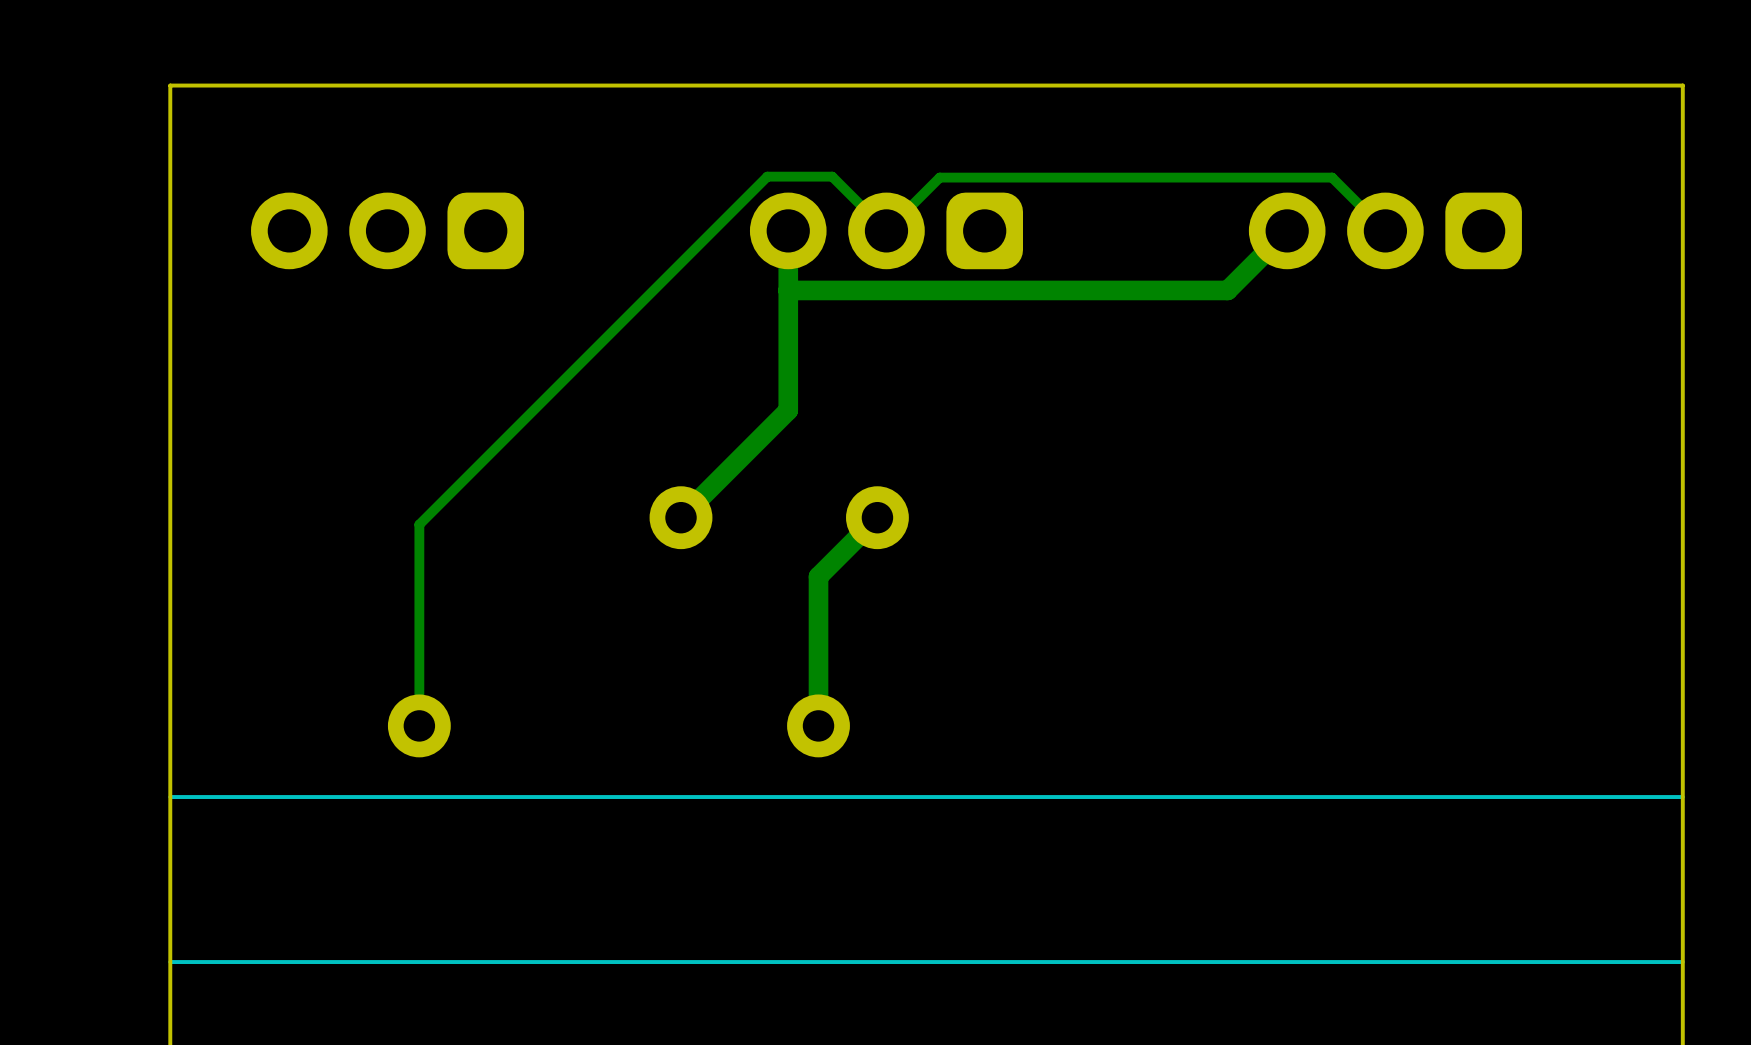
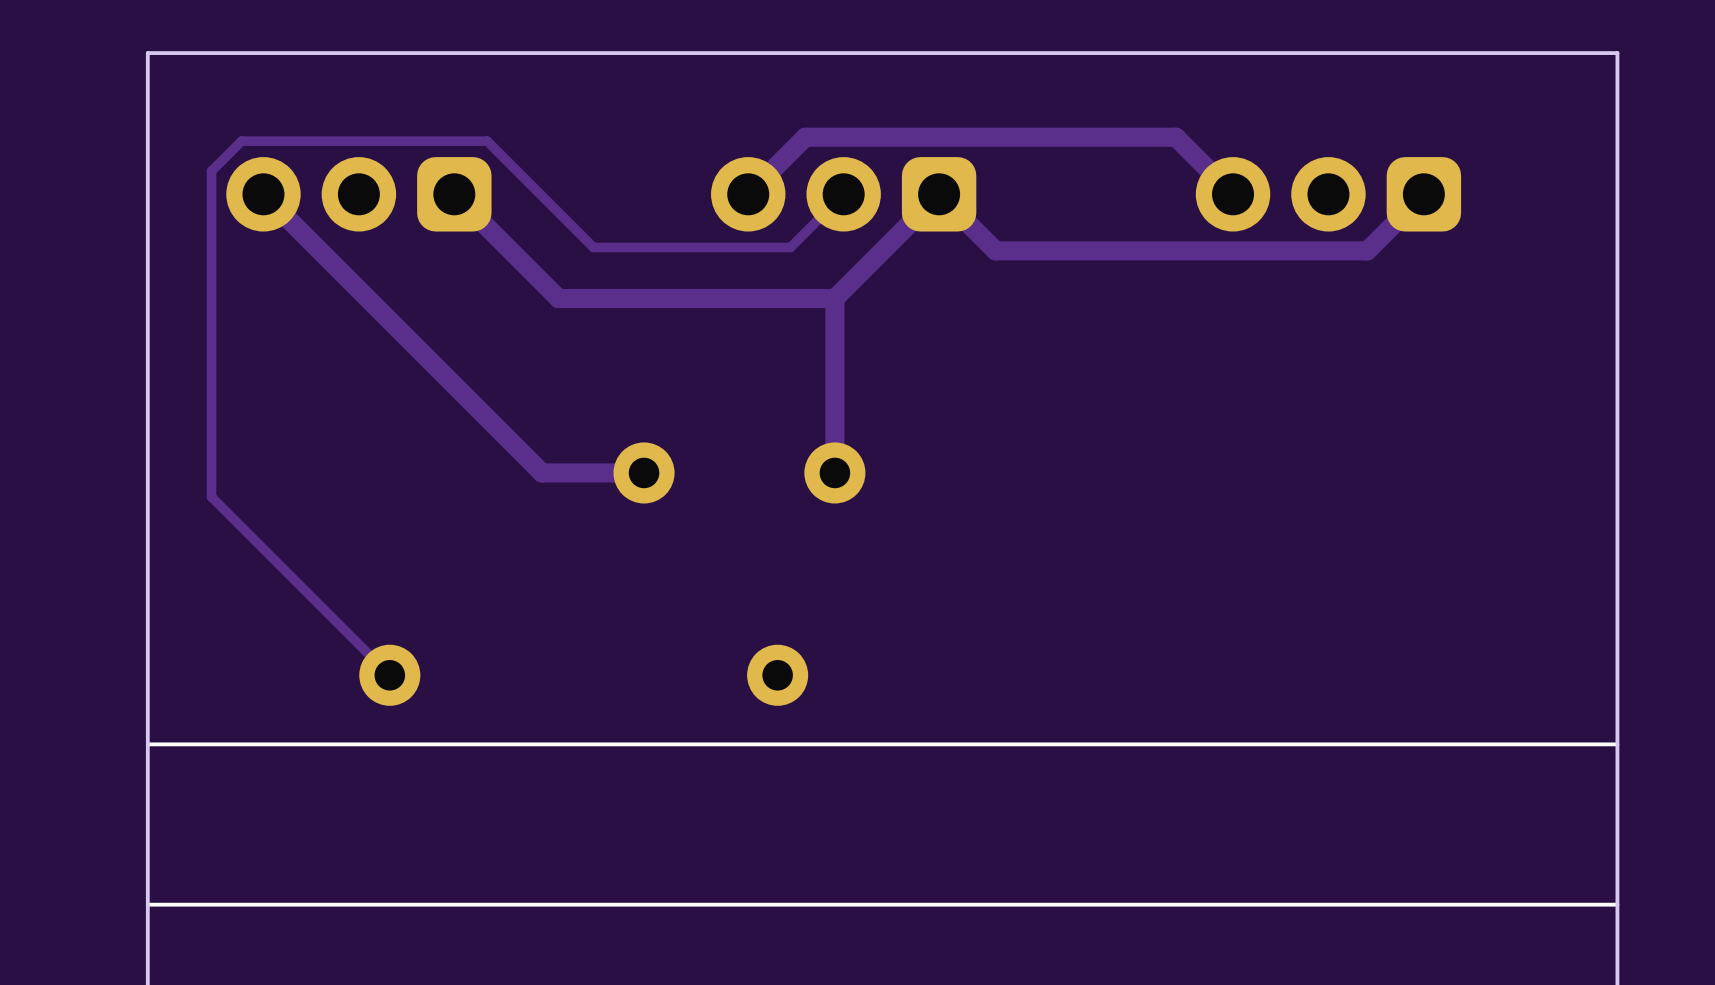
track: none -> (454, 194) (558, 298) (834, 298)
track: (788, 230) (788, 410) (681, 517) -> (263, 194) (542, 472) (644, 472)
track: (1287, 230) (1227, 290) (788, 290) -> (1233, 194) (1175, 137) (805, 137) (748, 194)
track: (1385, 230) (1332, 177) (939, 177) (886, 230) (832, 176) (767, 176) (419, 524) (419, 725) -> (843, 194) (790, 247) (593, 247) (487, 141) (241, 141) (211, 171) (211, 496) (389, 675)
track: none -> (1423, 194) (1367, 250) (995, 250) (939, 194) (834, 298)
track: (877, 517) (818, 576) (818, 725) -> (834, 472) (834, 298)

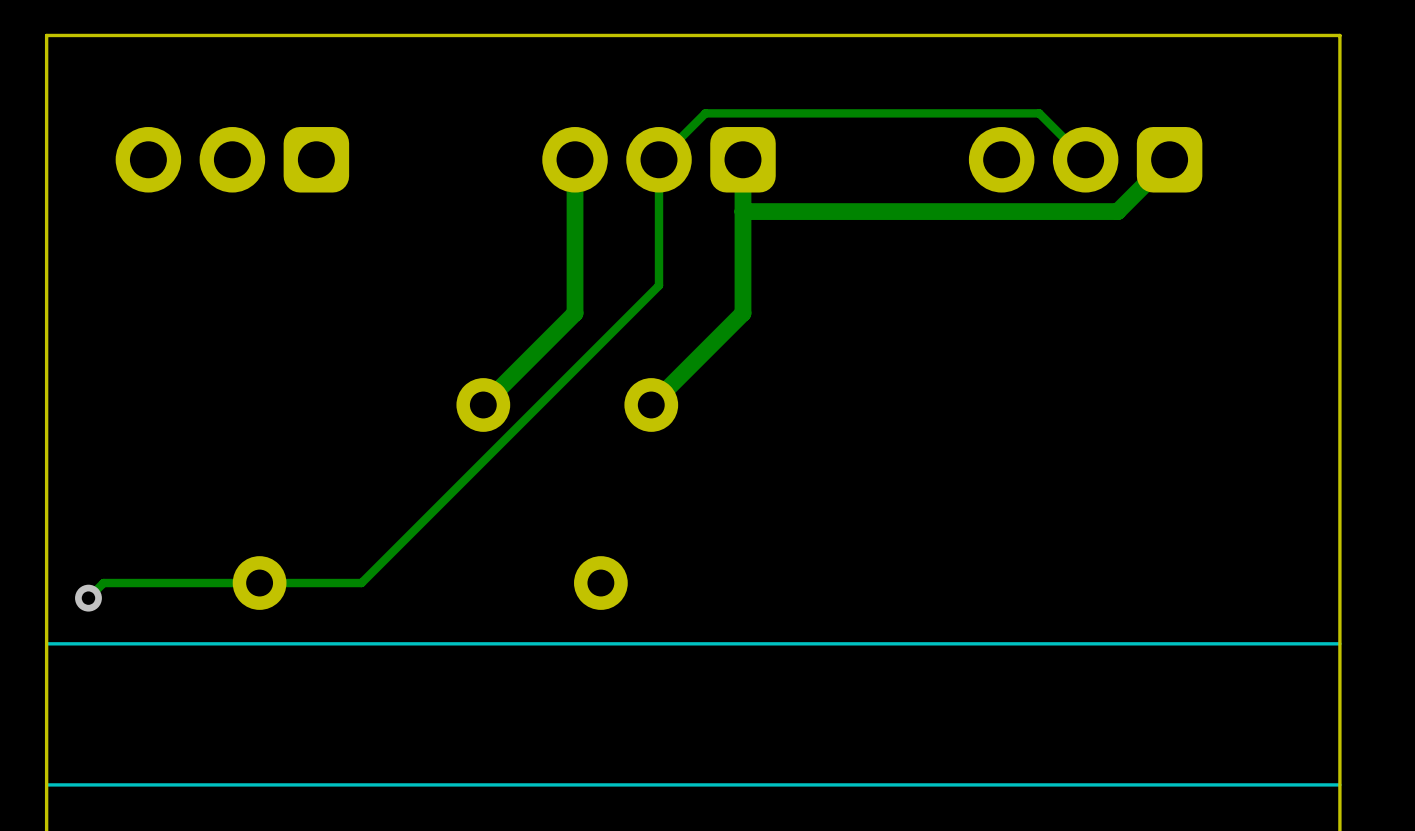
track: (263, 194) (542, 472) (644, 472) -> (575, 159) (575, 313) (483, 404)
track: (454, 194) (558, 298) (834, 298) -> none
track: (843, 194) (790, 247) (593, 247) (487, 141) (241, 141) (211, 171) (211, 496) (389, 675) -> none
track: (1233, 194) (1175, 137) (805, 137) (748, 194) -> none
track: none -> (1085, 159) (1039, 113) (705, 113) (659, 159) (659, 285) (361, 583) (103, 583) (88, 598)
track: (1367, 250) (995, 250) (939, 194) (834, 298) -> (1119, 209) (1117, 211) (742, 211)
track: (834, 298) (834, 472) -> (742, 159) (742, 313) (651, 404)
via: none -> (88, 598)

